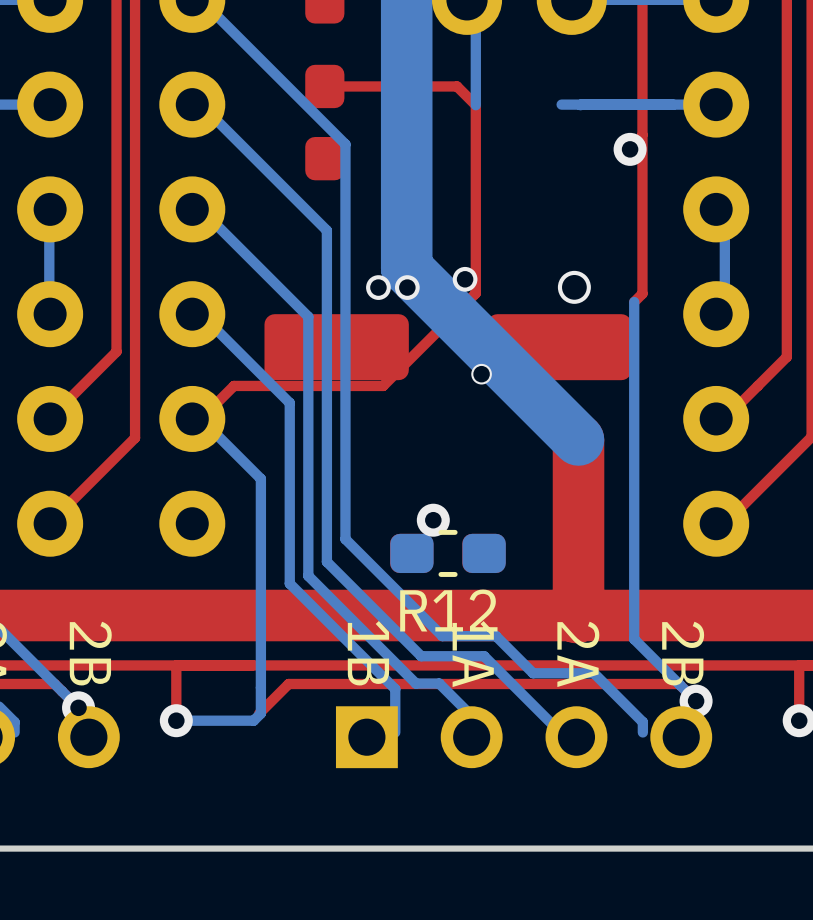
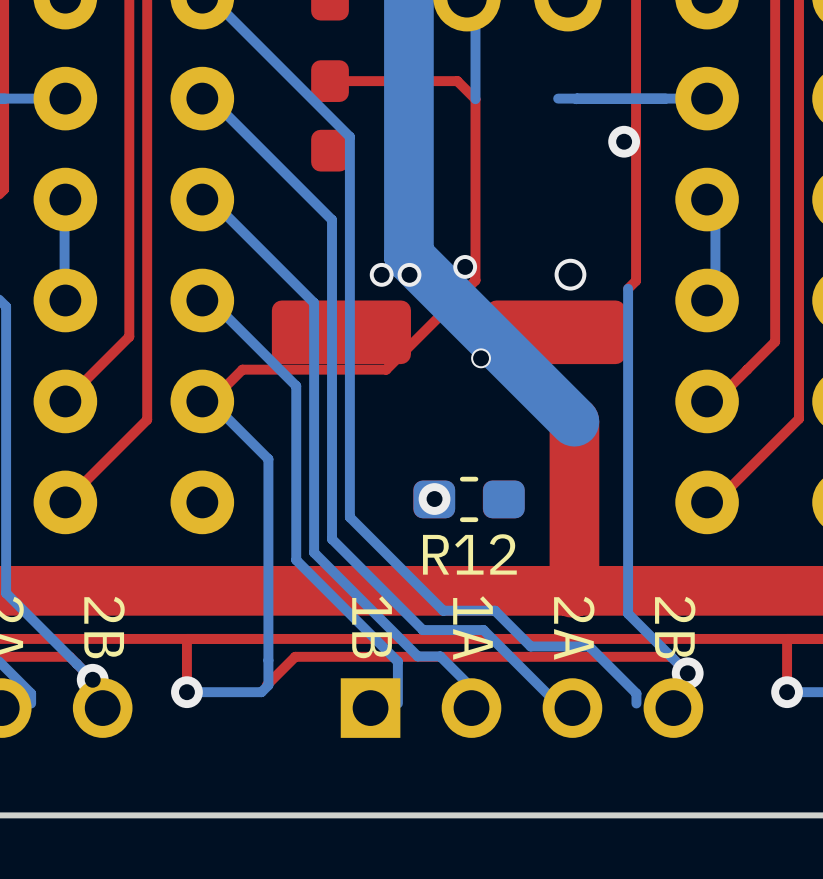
R12 position: (448, 553) -> (469, 499)

